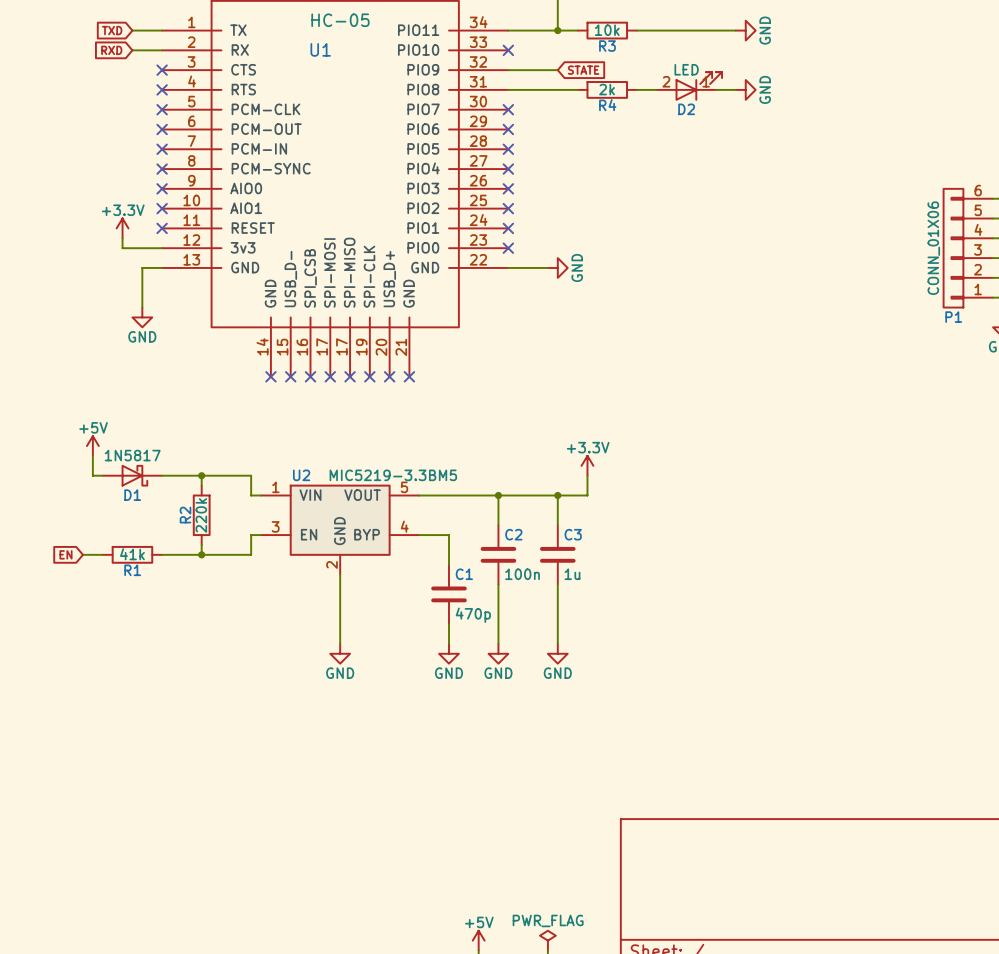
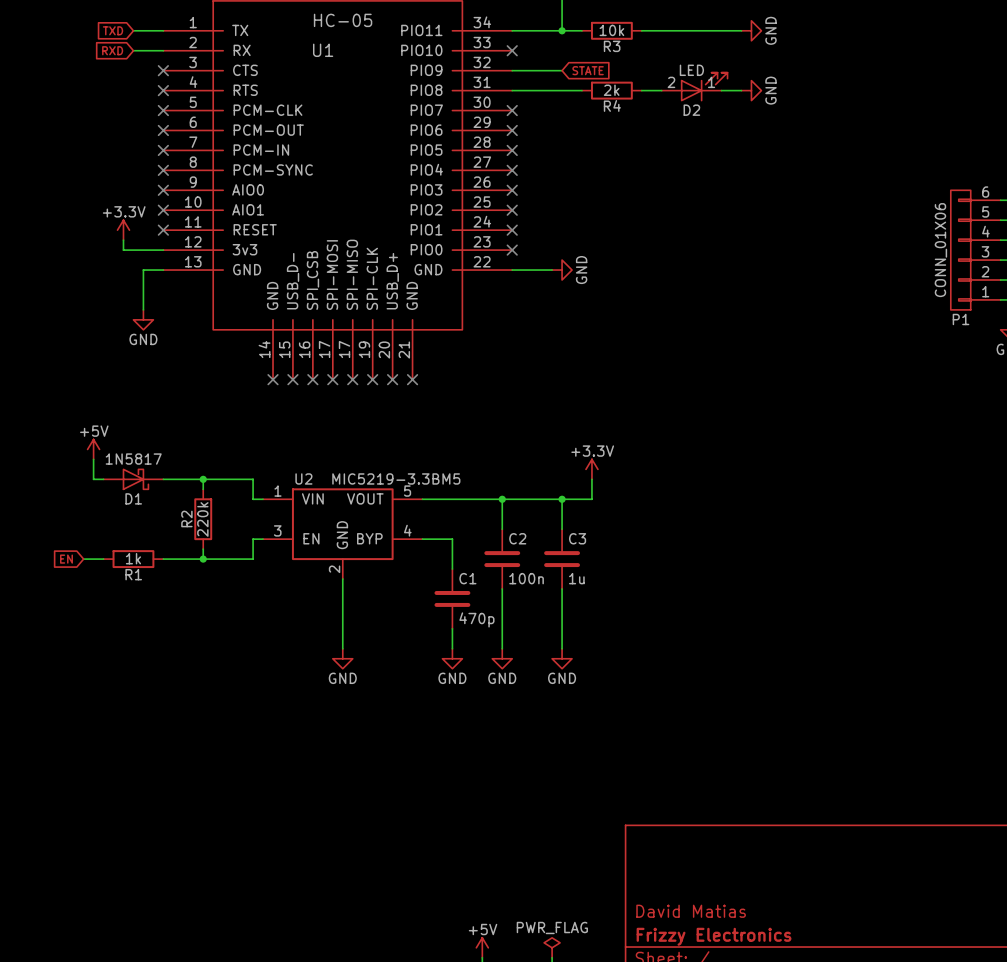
R1 value: 41k (132, 554) -> 1k (133, 558)
title block: none -> David Matias (691, 911)
title block: none -> Frizzy Electronics (714, 936)

